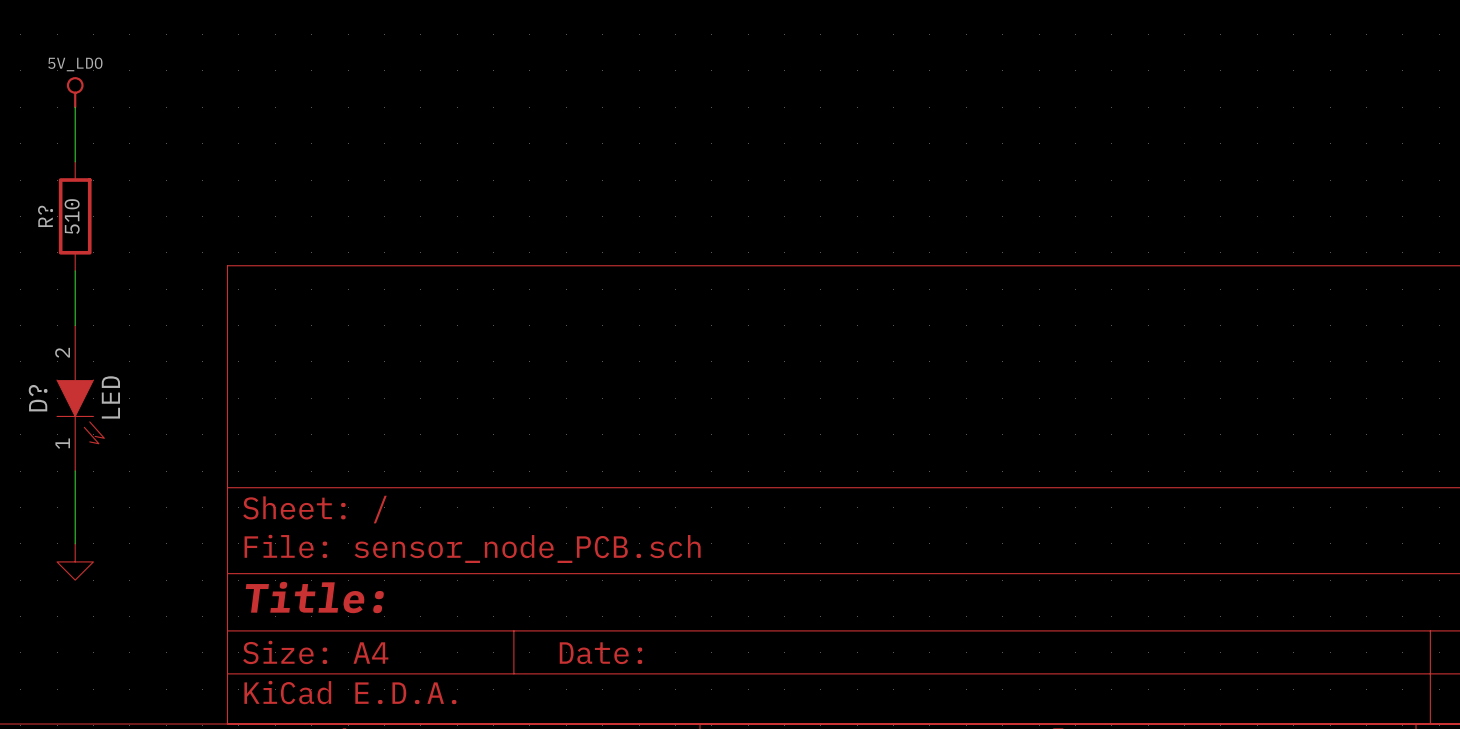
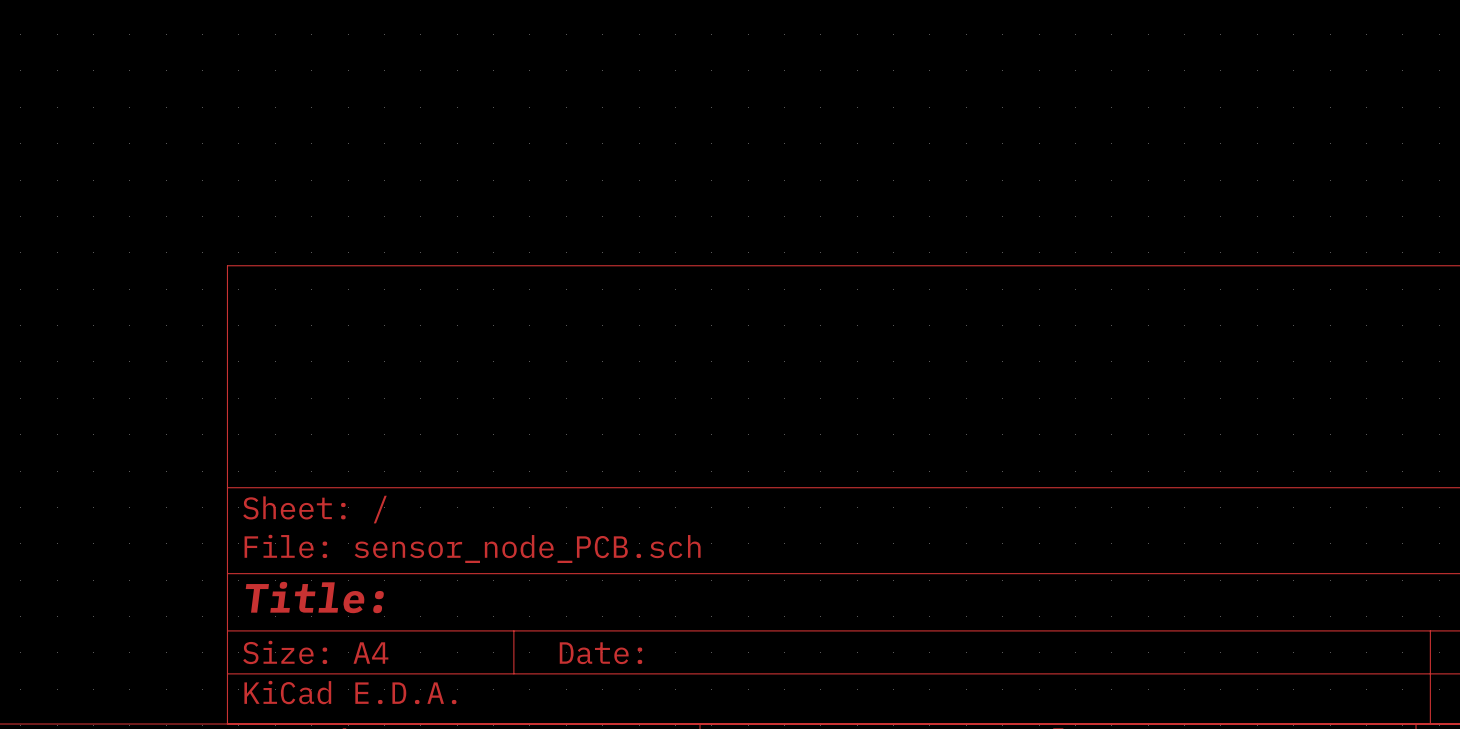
power symbol: 5V_LDO (75, 92) -> none
wire: (75, 107) (75, 161) -> none
R?: 510 (75, 216) -> none
wire: (75, 270) (75, 325) -> none
D?: LED (80, 398) -> none
wire: (75, 471) (75, 543) -> none
power symbol: (75, 561) -> none

